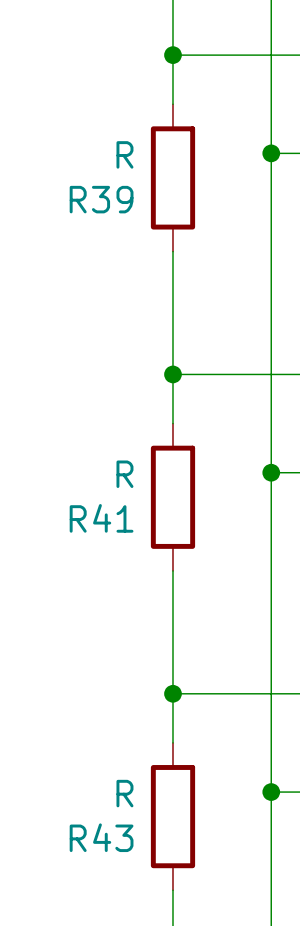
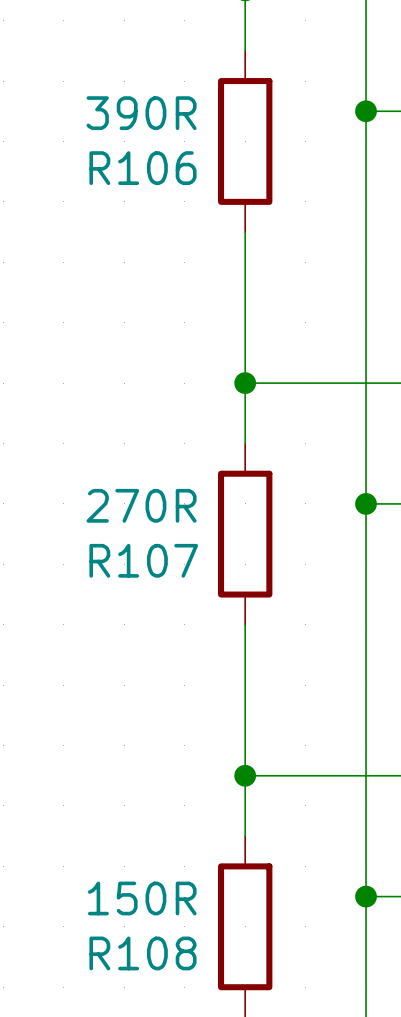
R39 value: R (124, 154) -> 390R (141, 113)
R39 name: R39 (101, 199) -> R106 (142, 168)
R41 value: R (124, 474) -> 270R (141, 505)
R41 name: R41 (101, 518) -> R107 (143, 560)
R43 value: R (124, 793) -> 150R (142, 898)
R43 name: R43 (101, 837) -> R108 (142, 953)

